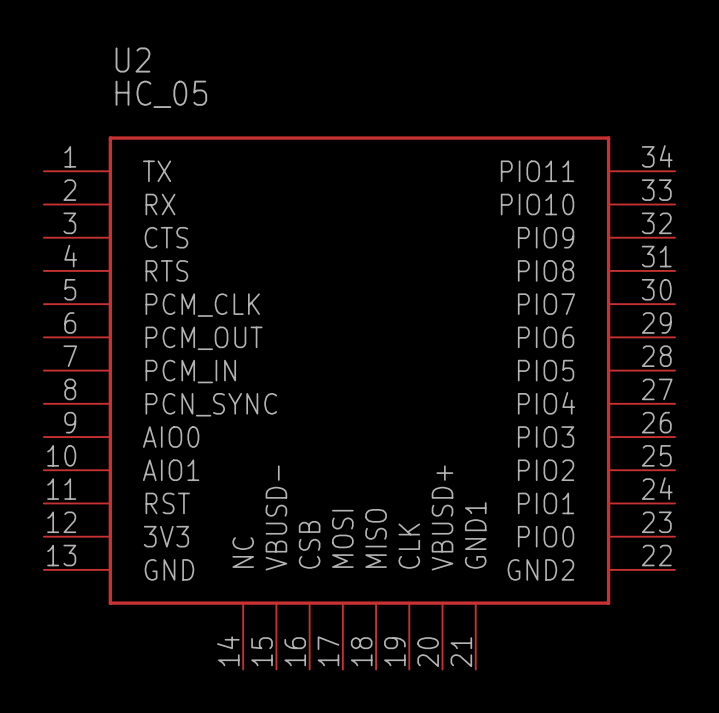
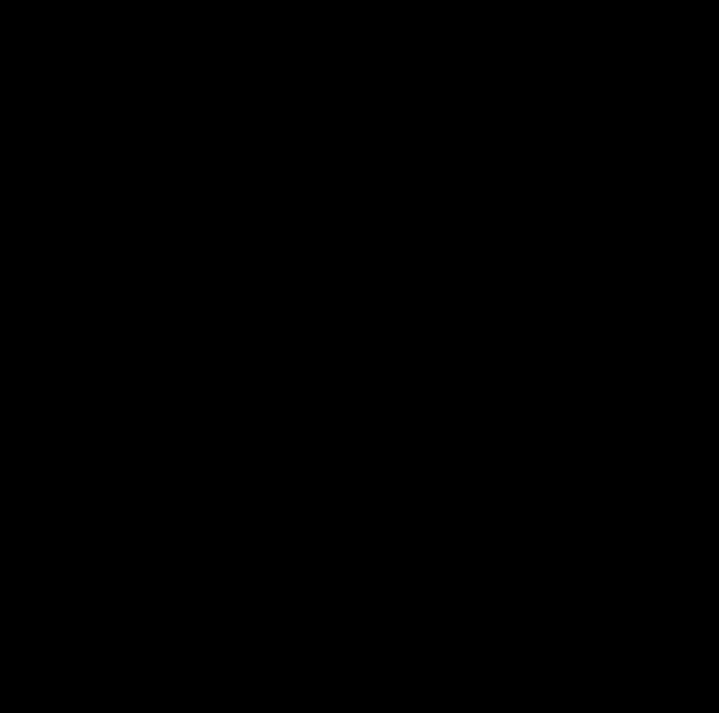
U2: HC_05 (359, 402) -> none

